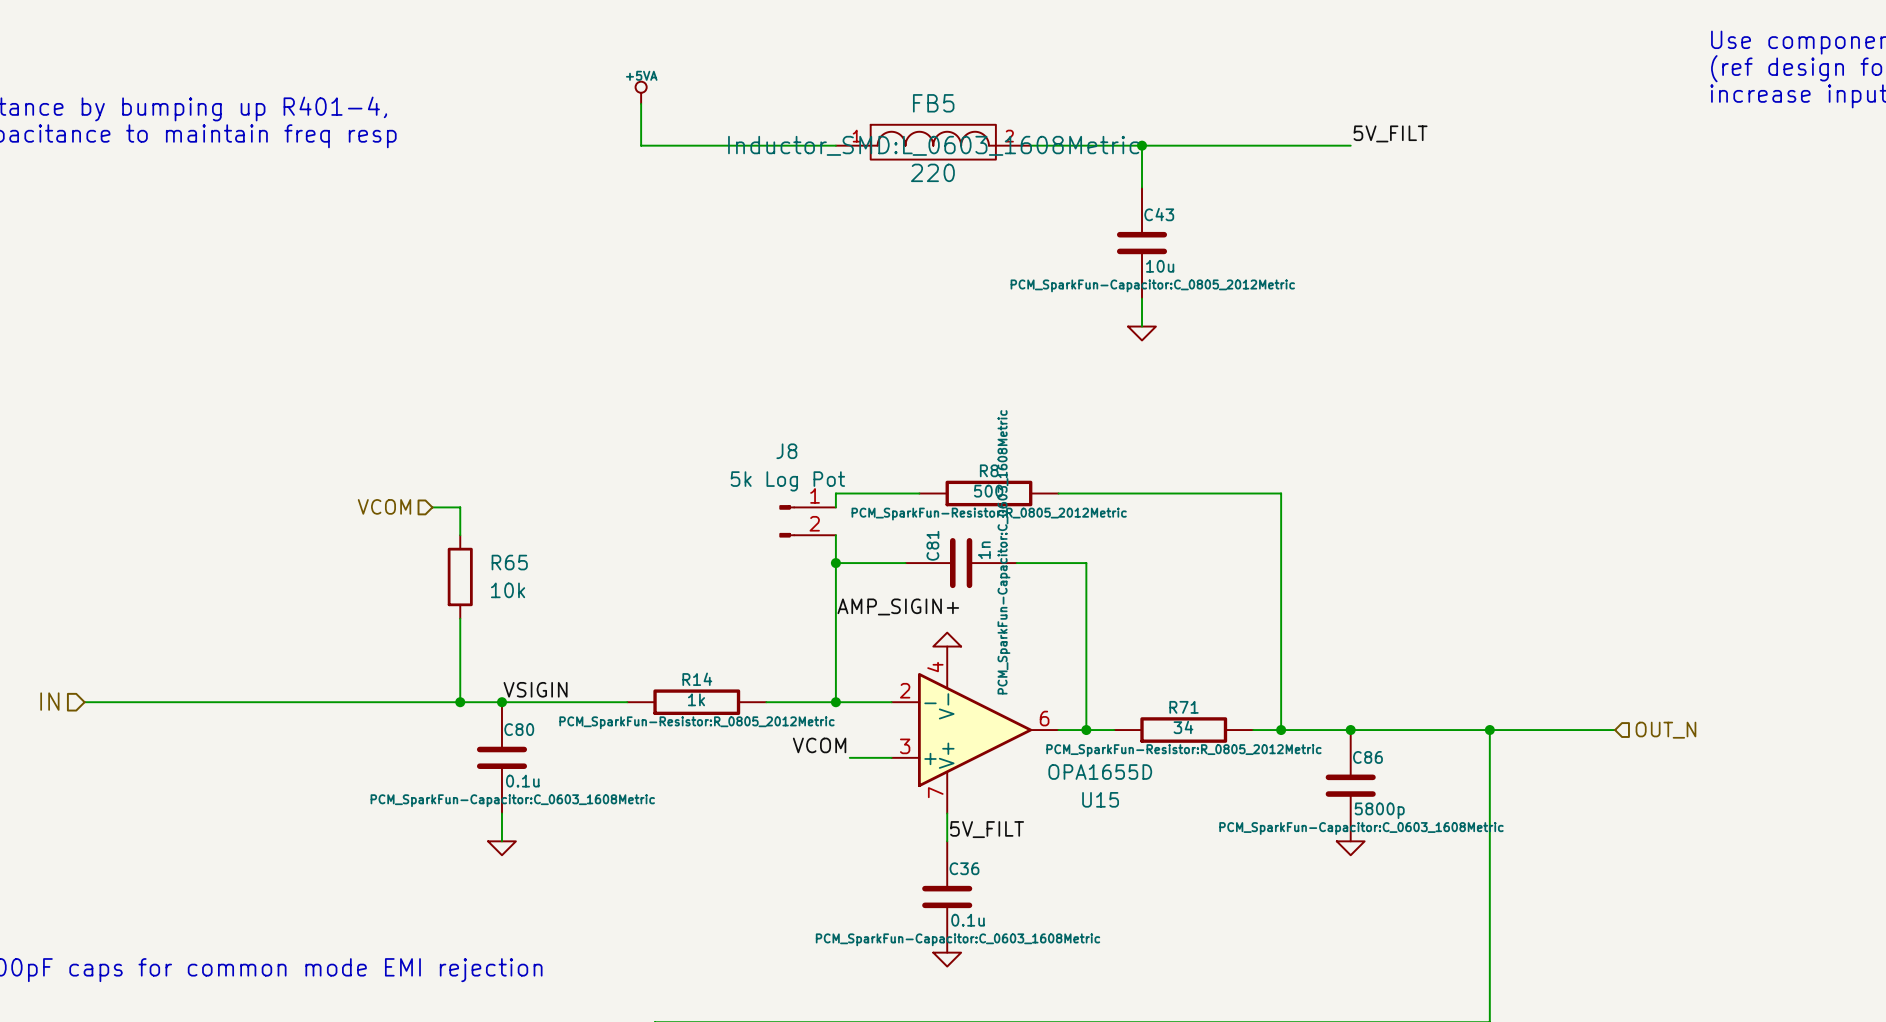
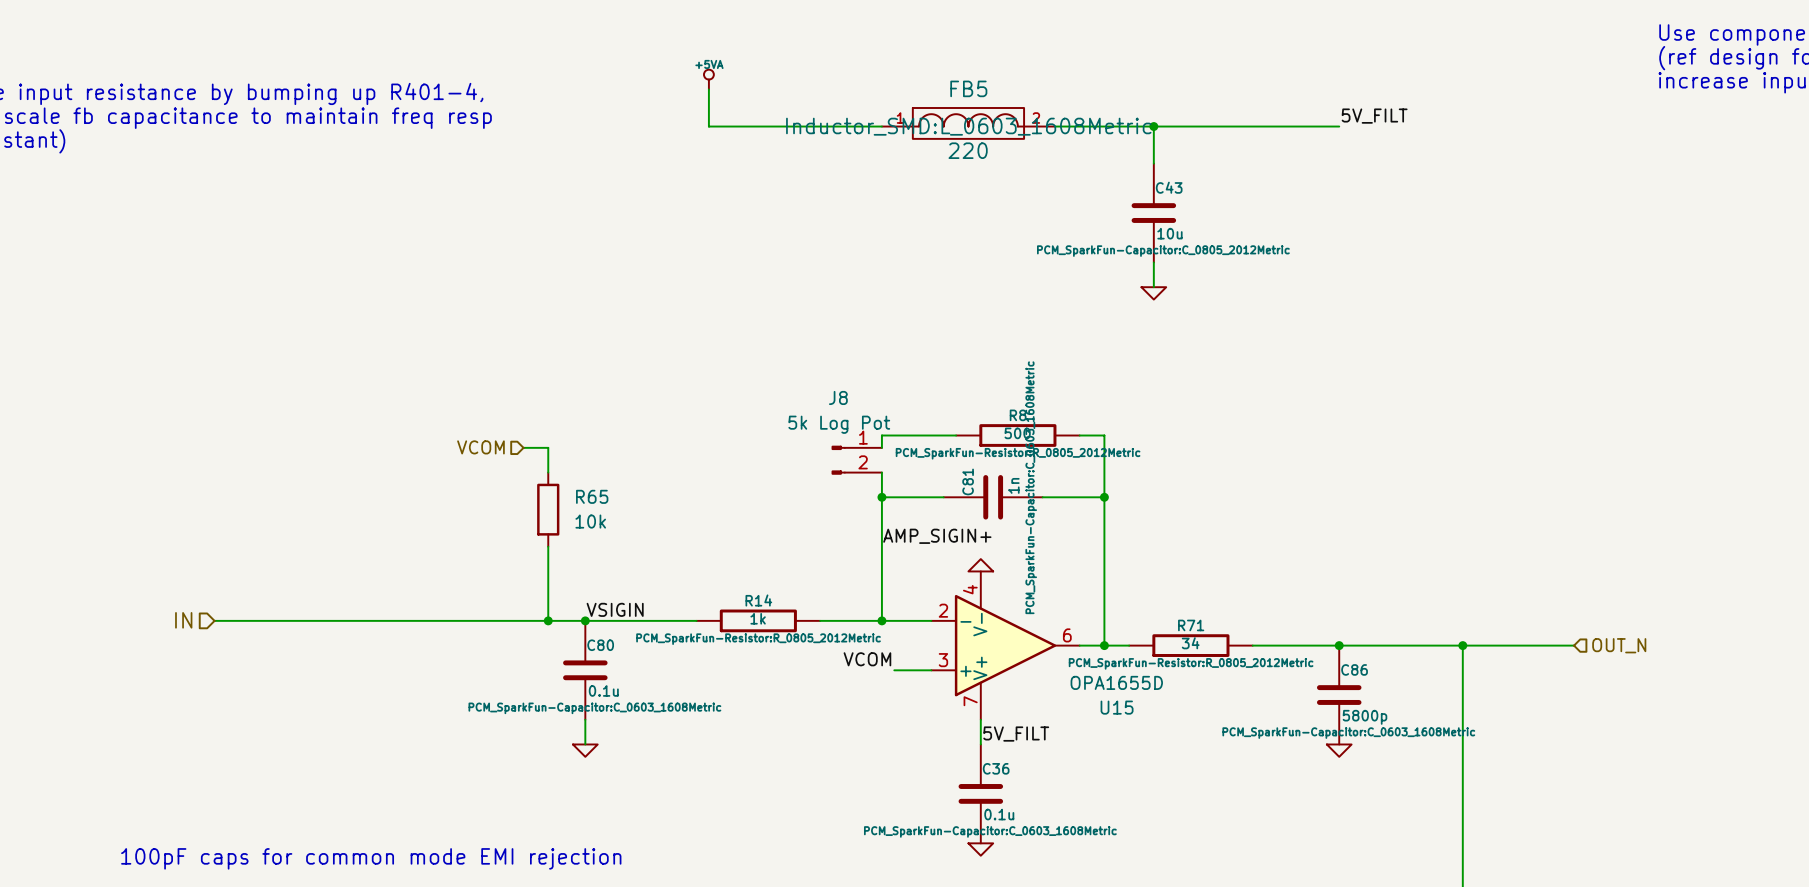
wire: (1086, 493) (1281, 493) (1281, 730) -> (1104, 435) (1104, 497)
junction: none -> (1104, 497)
junction: (1281, 730) -> none

